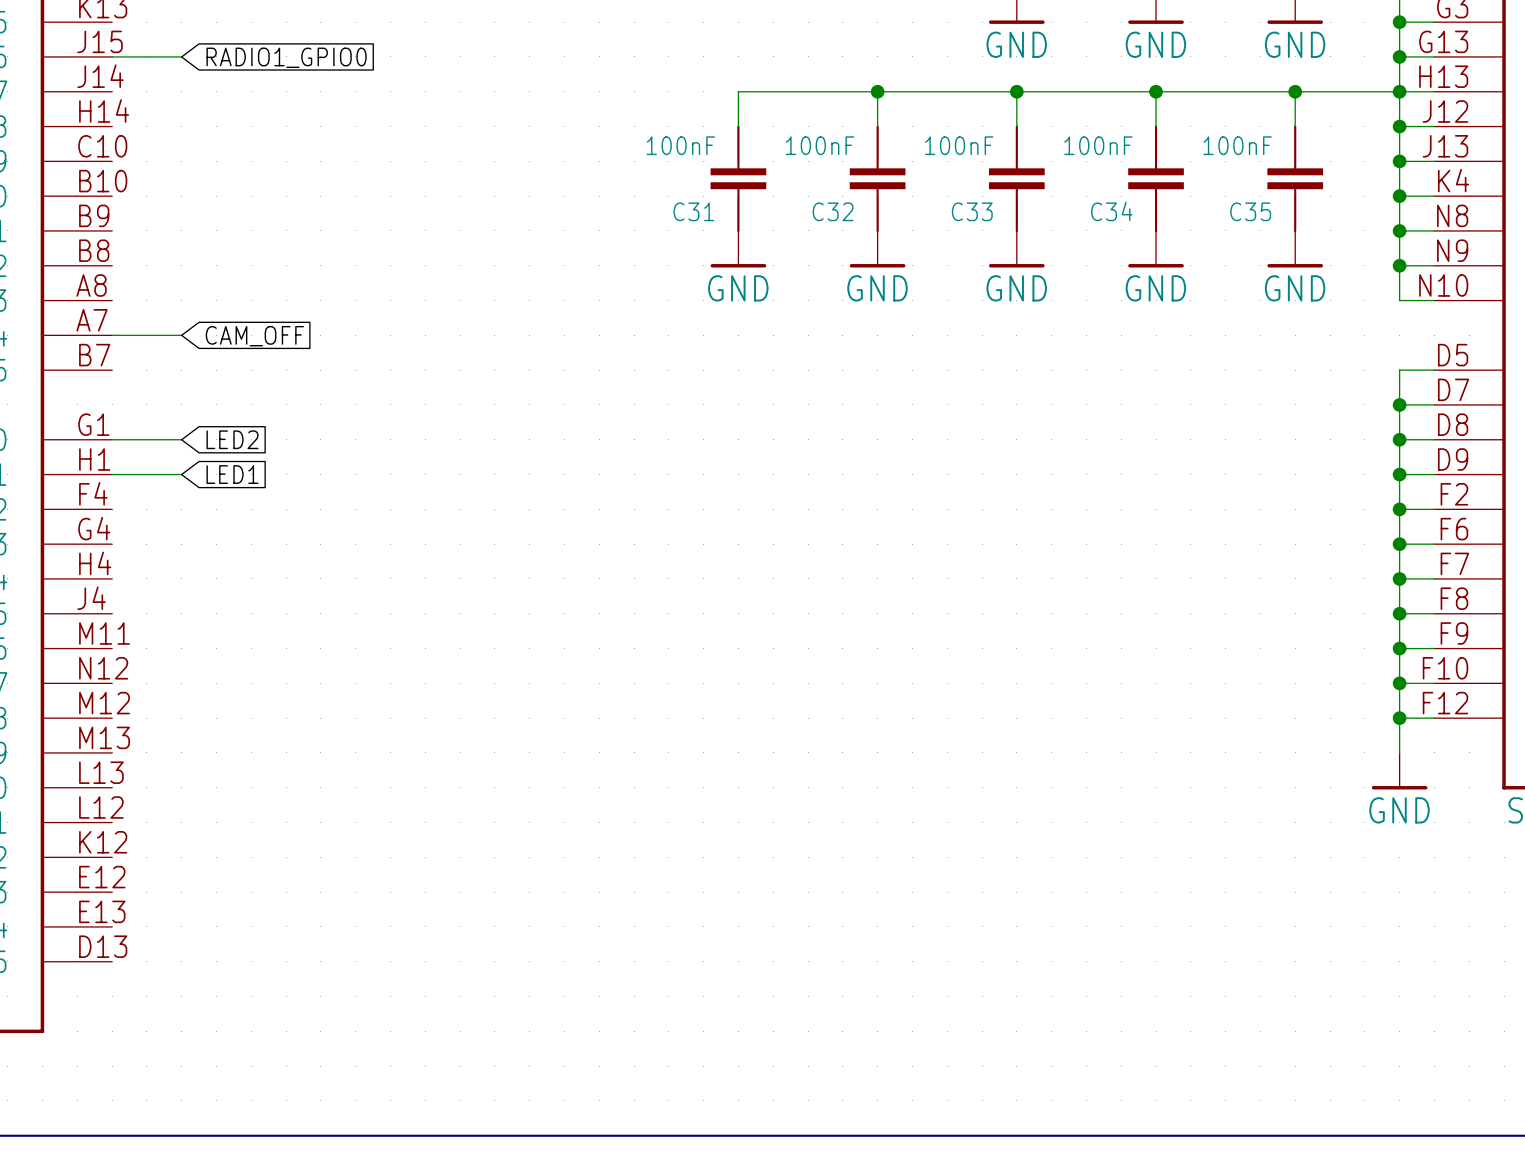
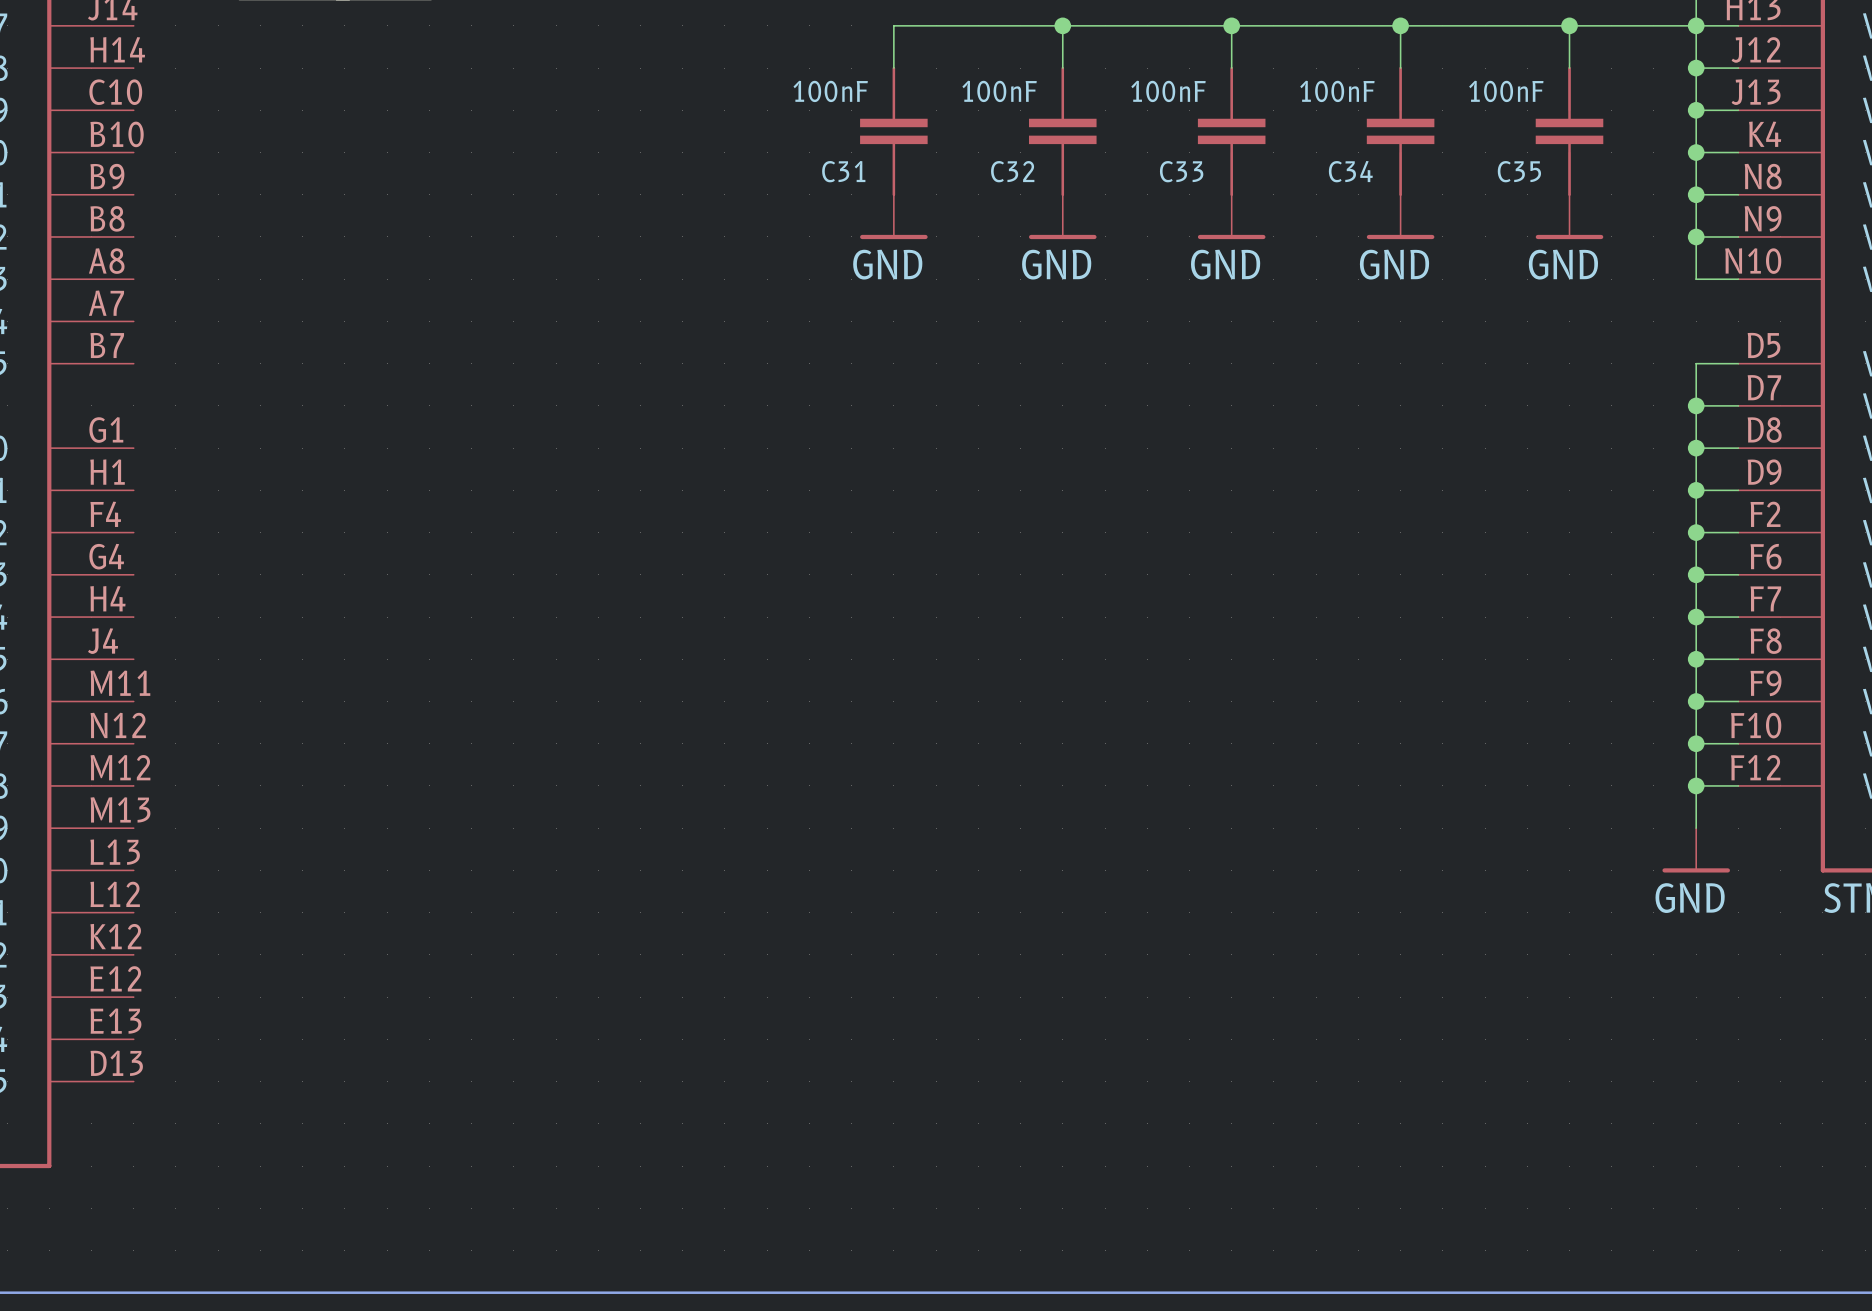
wire: (112, 335) (181, 335) -> none
global label: CAM_OFF (254, 336) -> none
wire: (112, 439) (181, 439) -> none
global label: LED2 (232, 439) -> none
wire: (112, 474) (181, 474) -> none
global label: LED1 (232, 474) -> none

